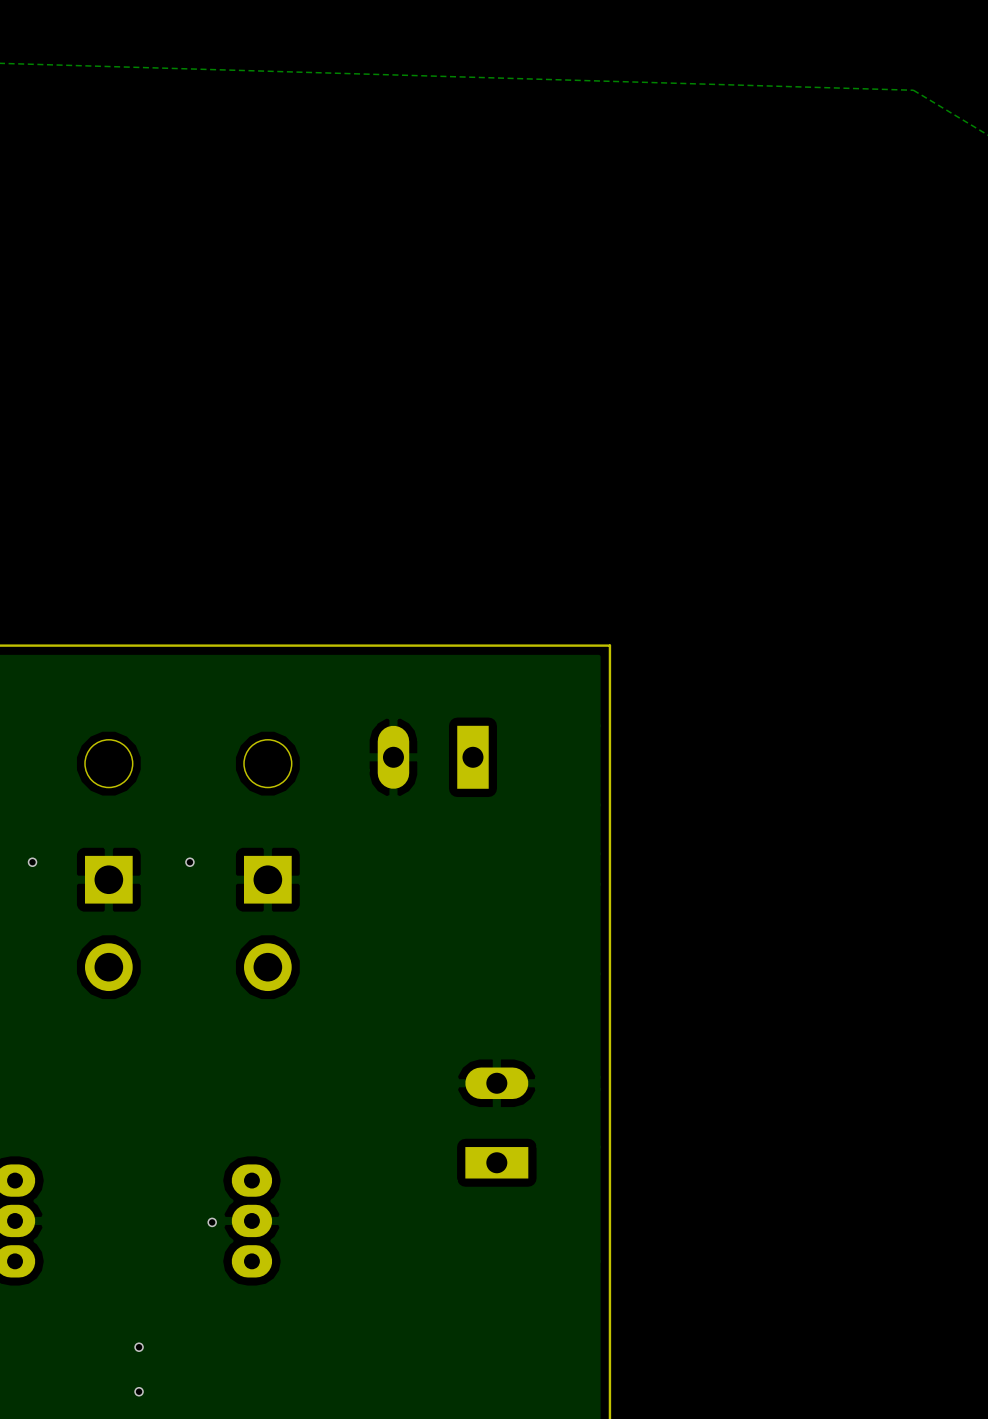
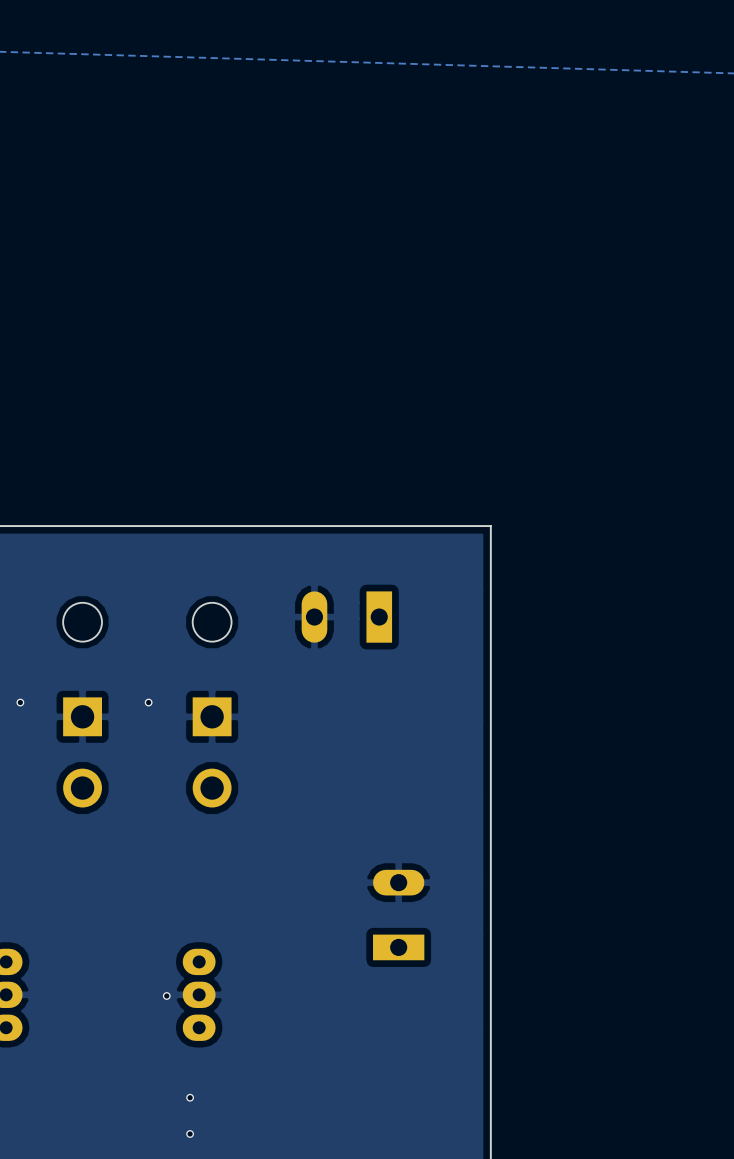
via: (139, 1347) -> none
via: none -> (190, 1097)
via: (139, 1391) -> none
via: none -> (190, 1133)

